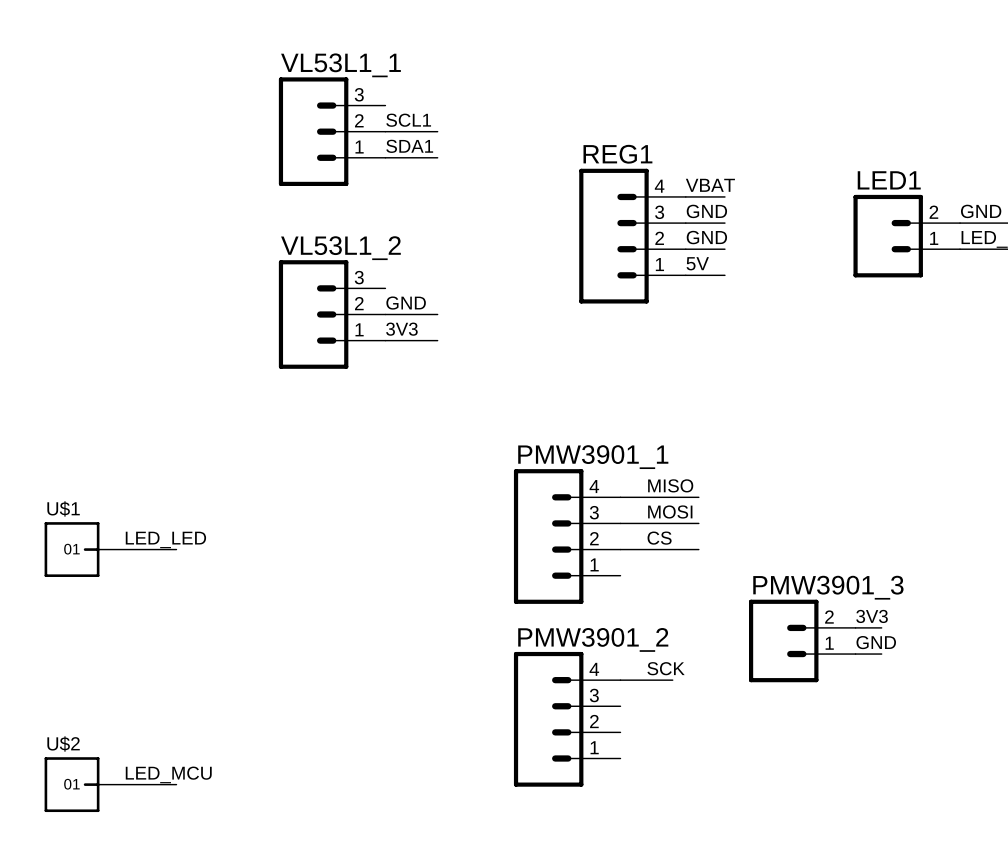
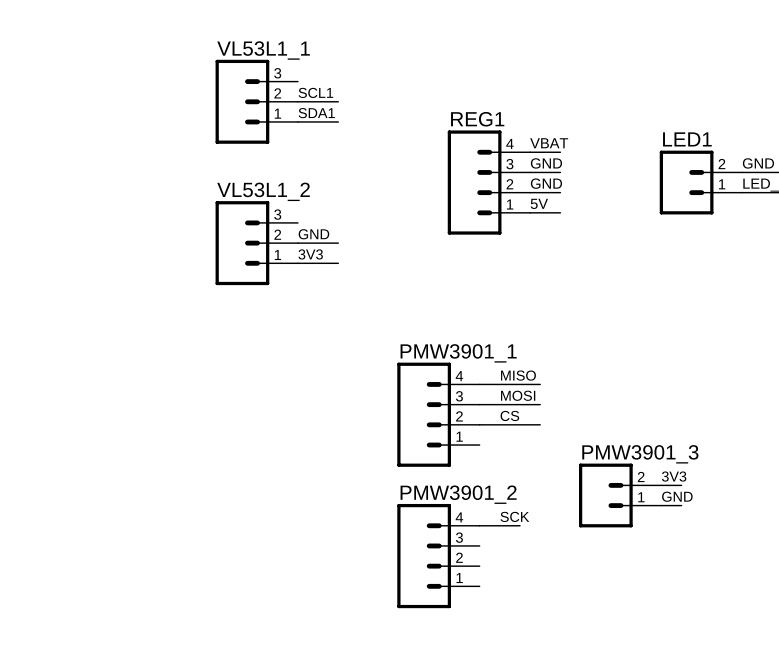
label: LED_LED (165, 539) -> none
U$1: (72, 549) -> none
wire: (98, 549) (176, 549) -> none
label: LED_MCU (168, 774) -> none
U$2: (72, 784) -> none
wire: (98, 784) (176, 784) -> none

